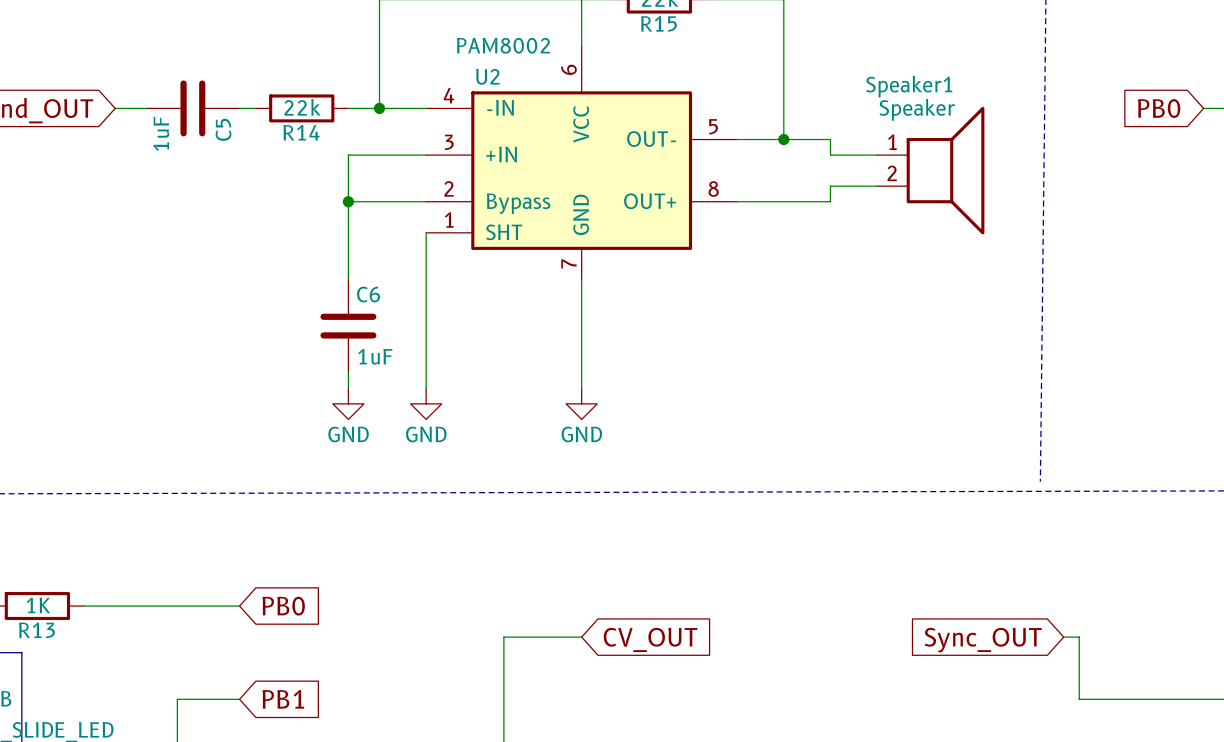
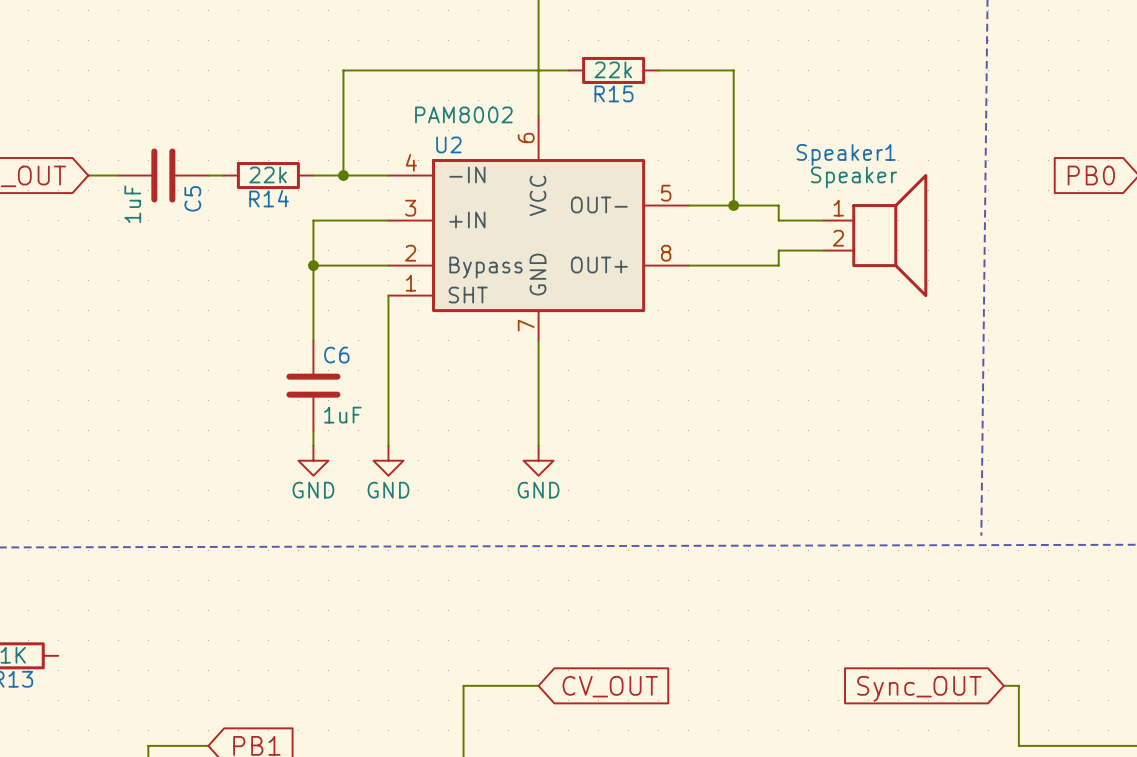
wire: (84, 606) (239, 606) -> none
global label: PB0 (283, 606) -> none

